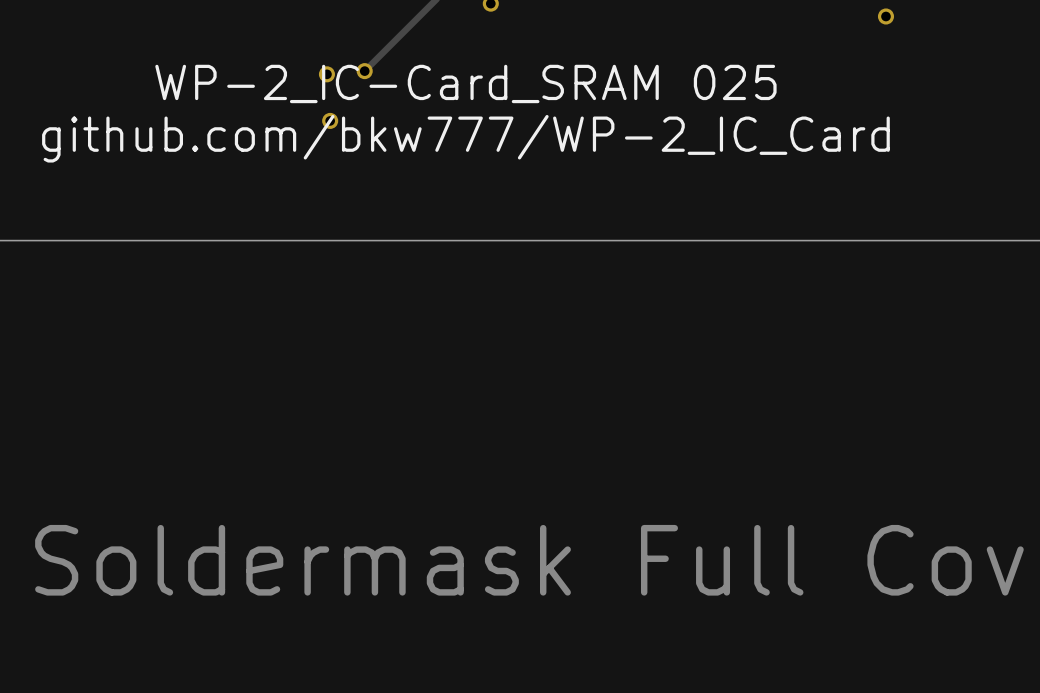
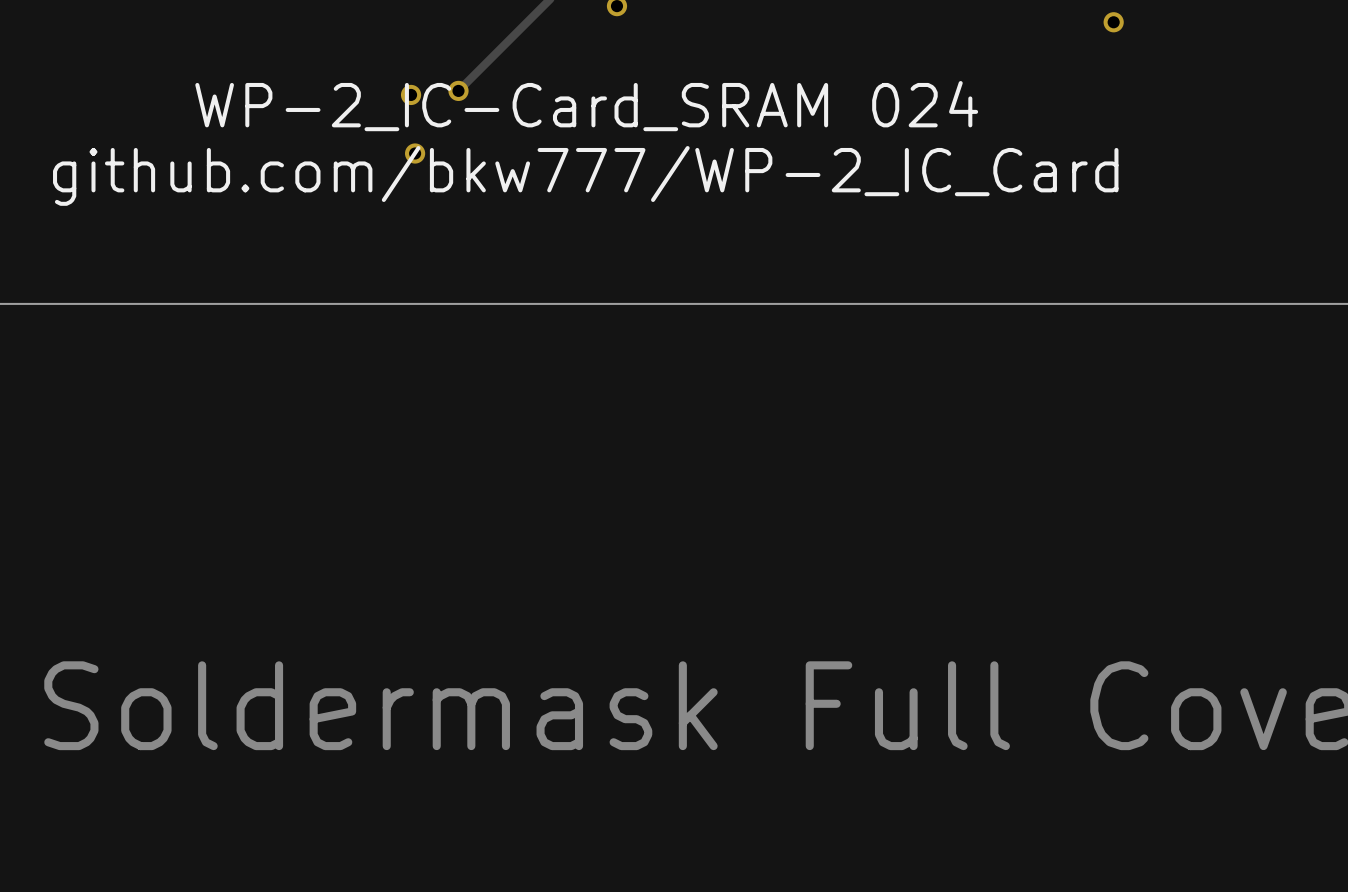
text: WP-2_IC-Card_SRAM 025 (465, 83) -> WP-2_IC-Card_SRAM 024 (586, 106)

